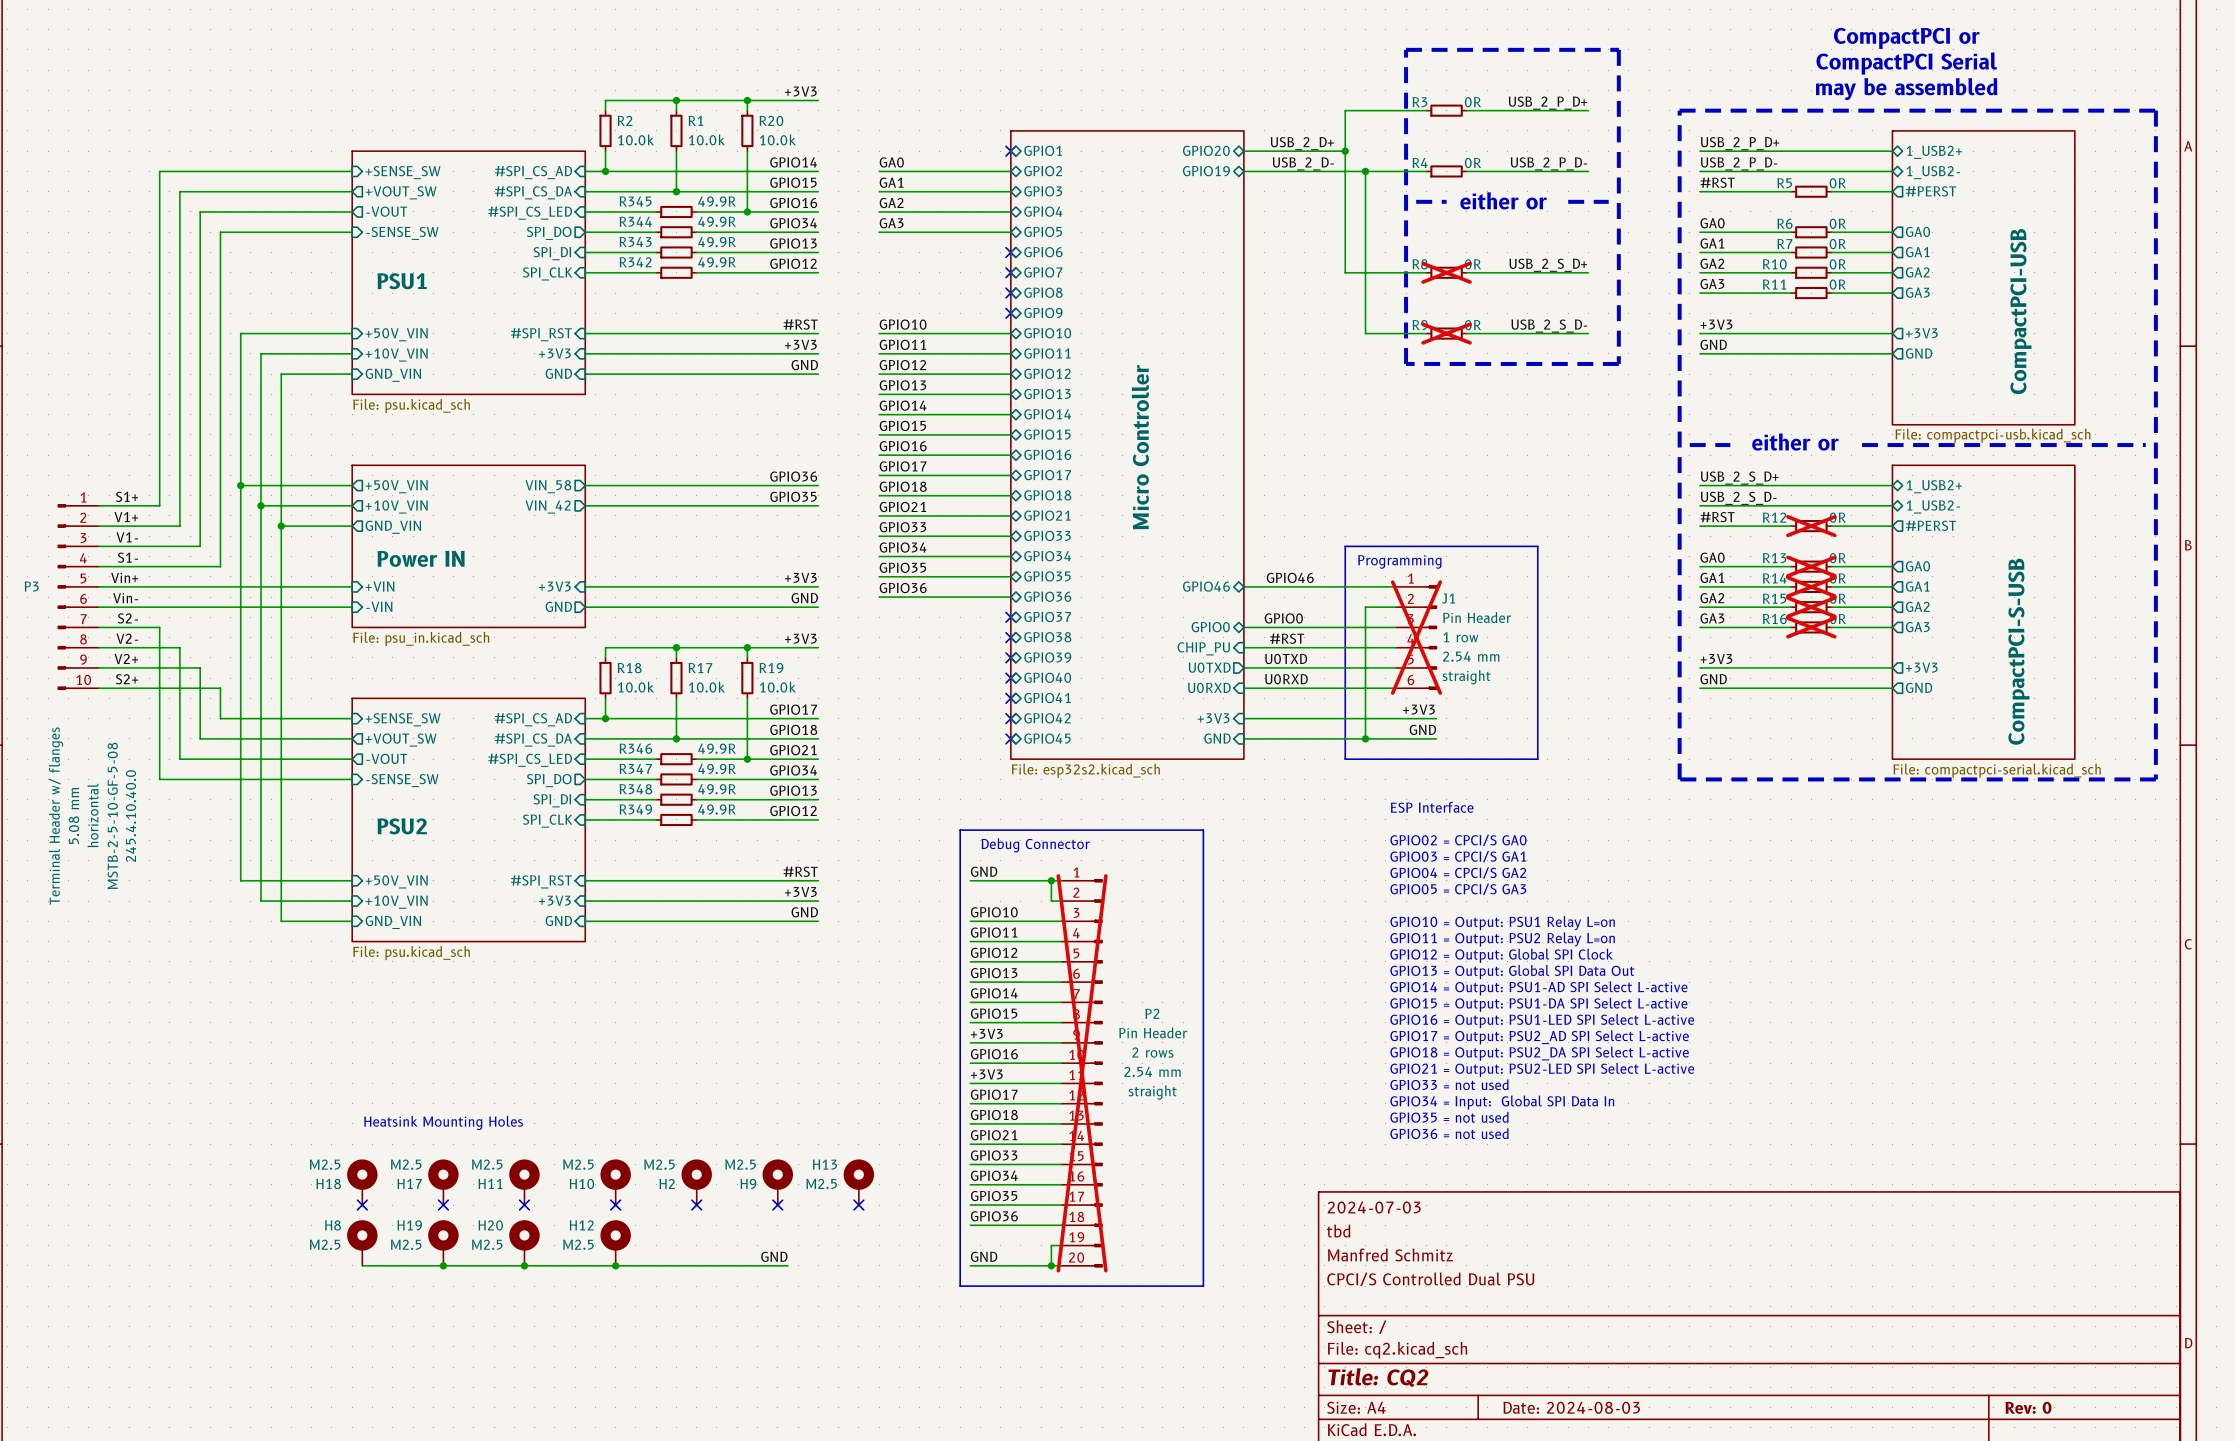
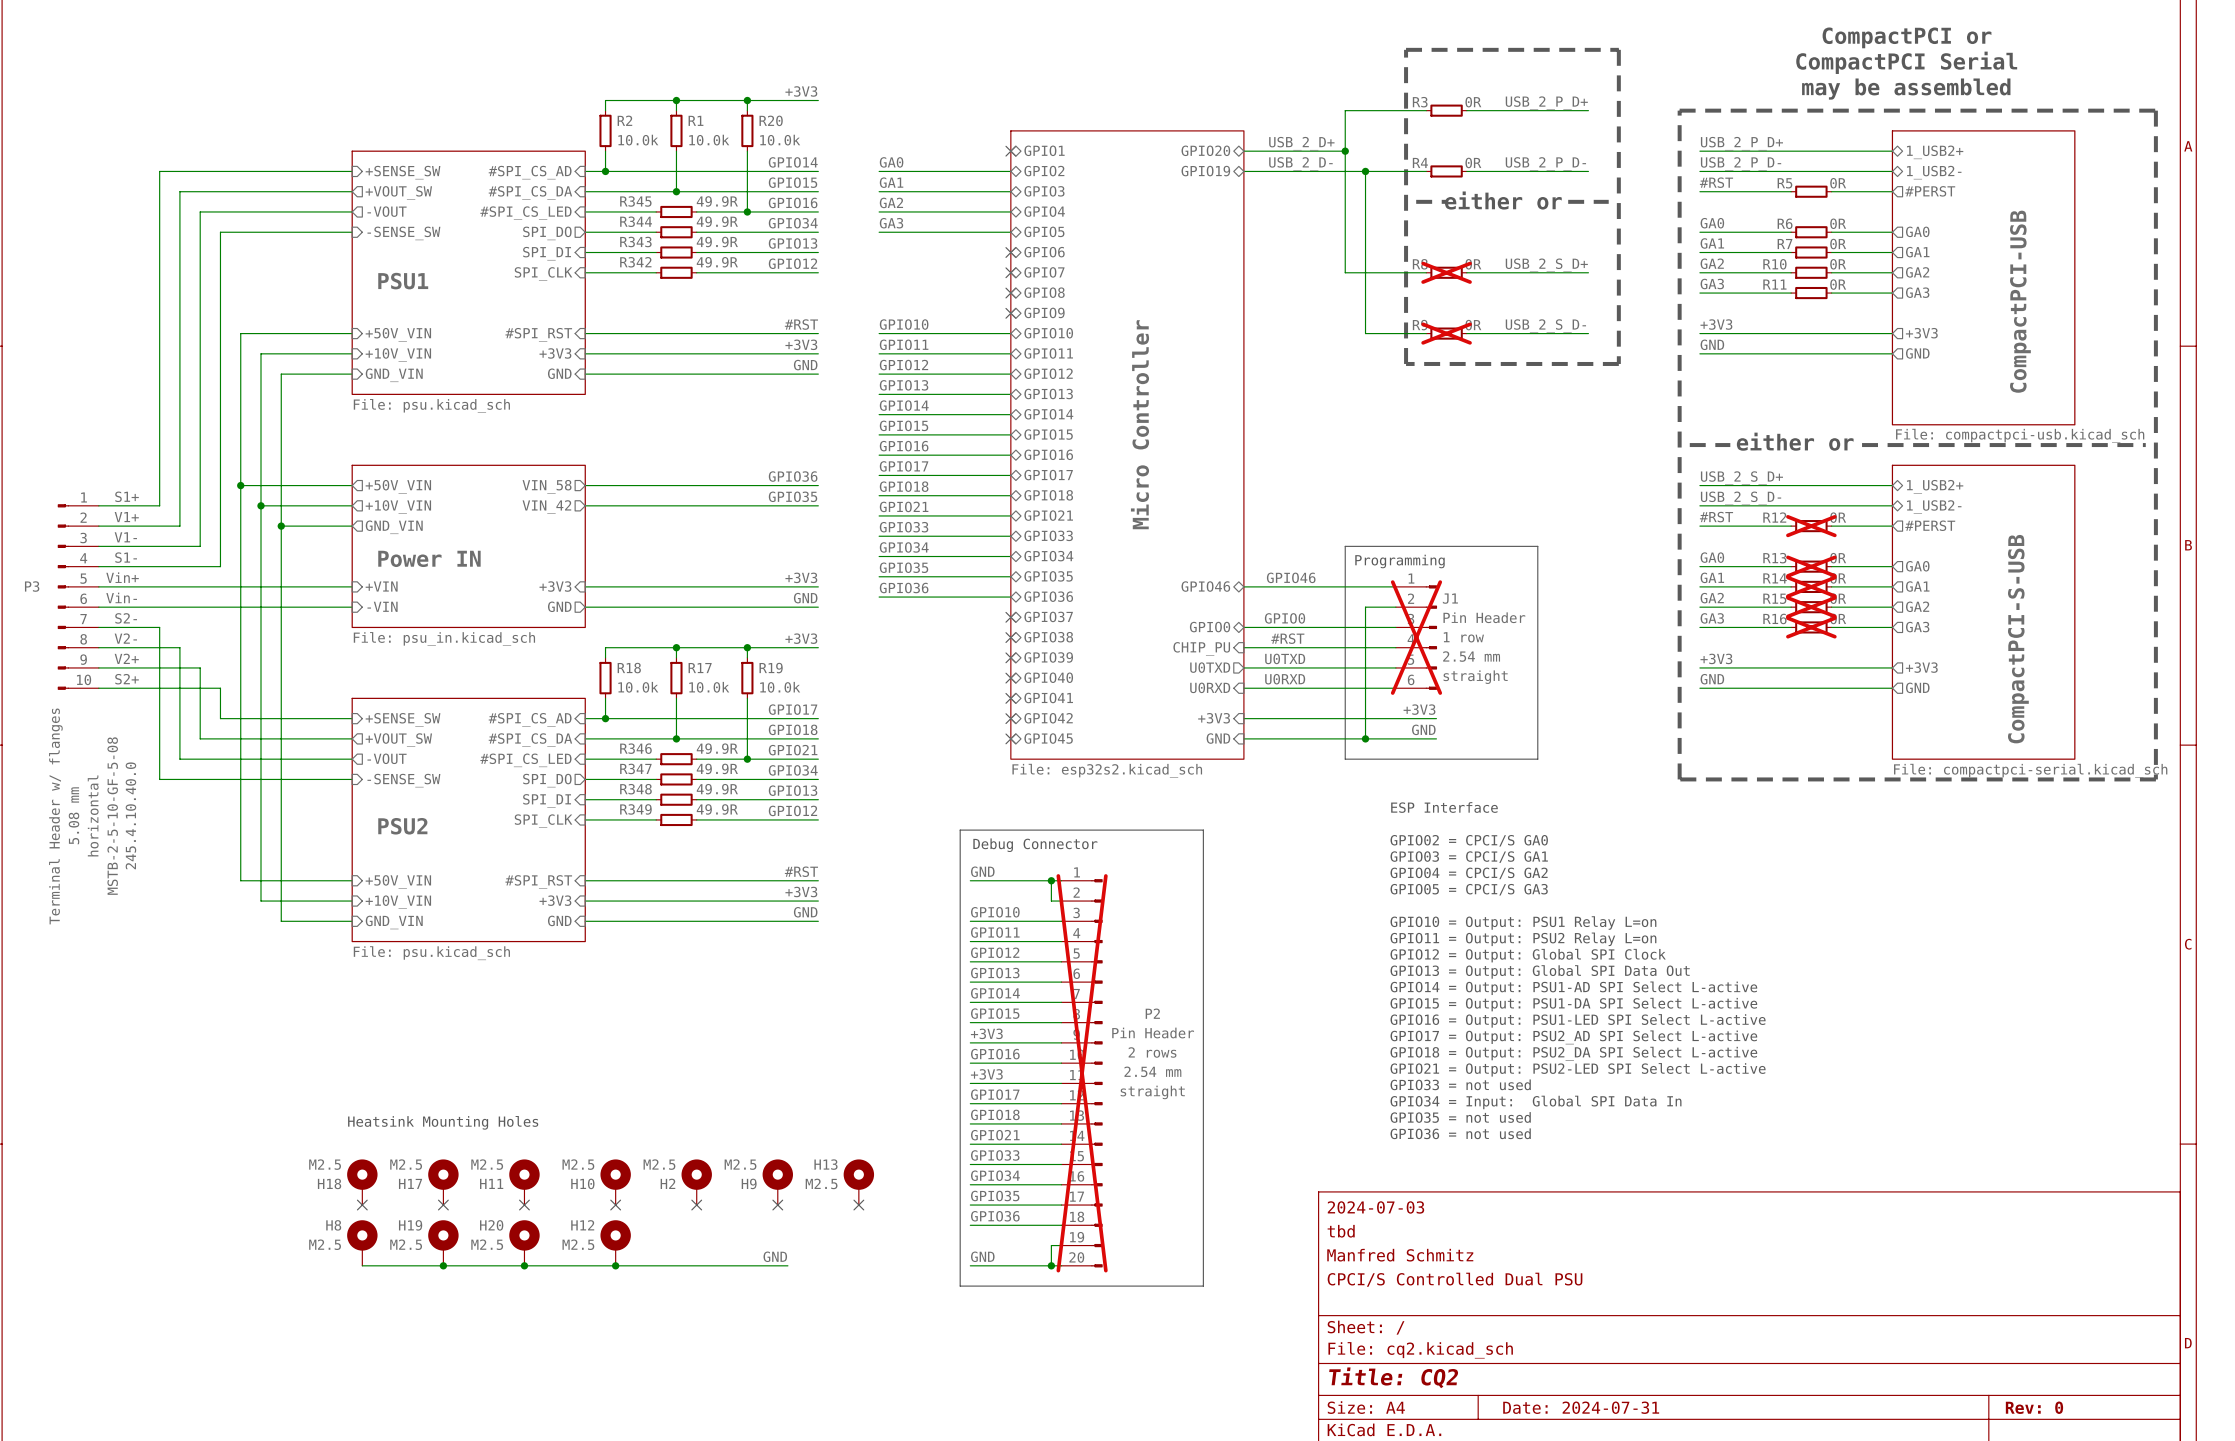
title block: Date: 2024-08-03 (1571, 1407) -> Date: 2024-07-31 (1581, 1407)

